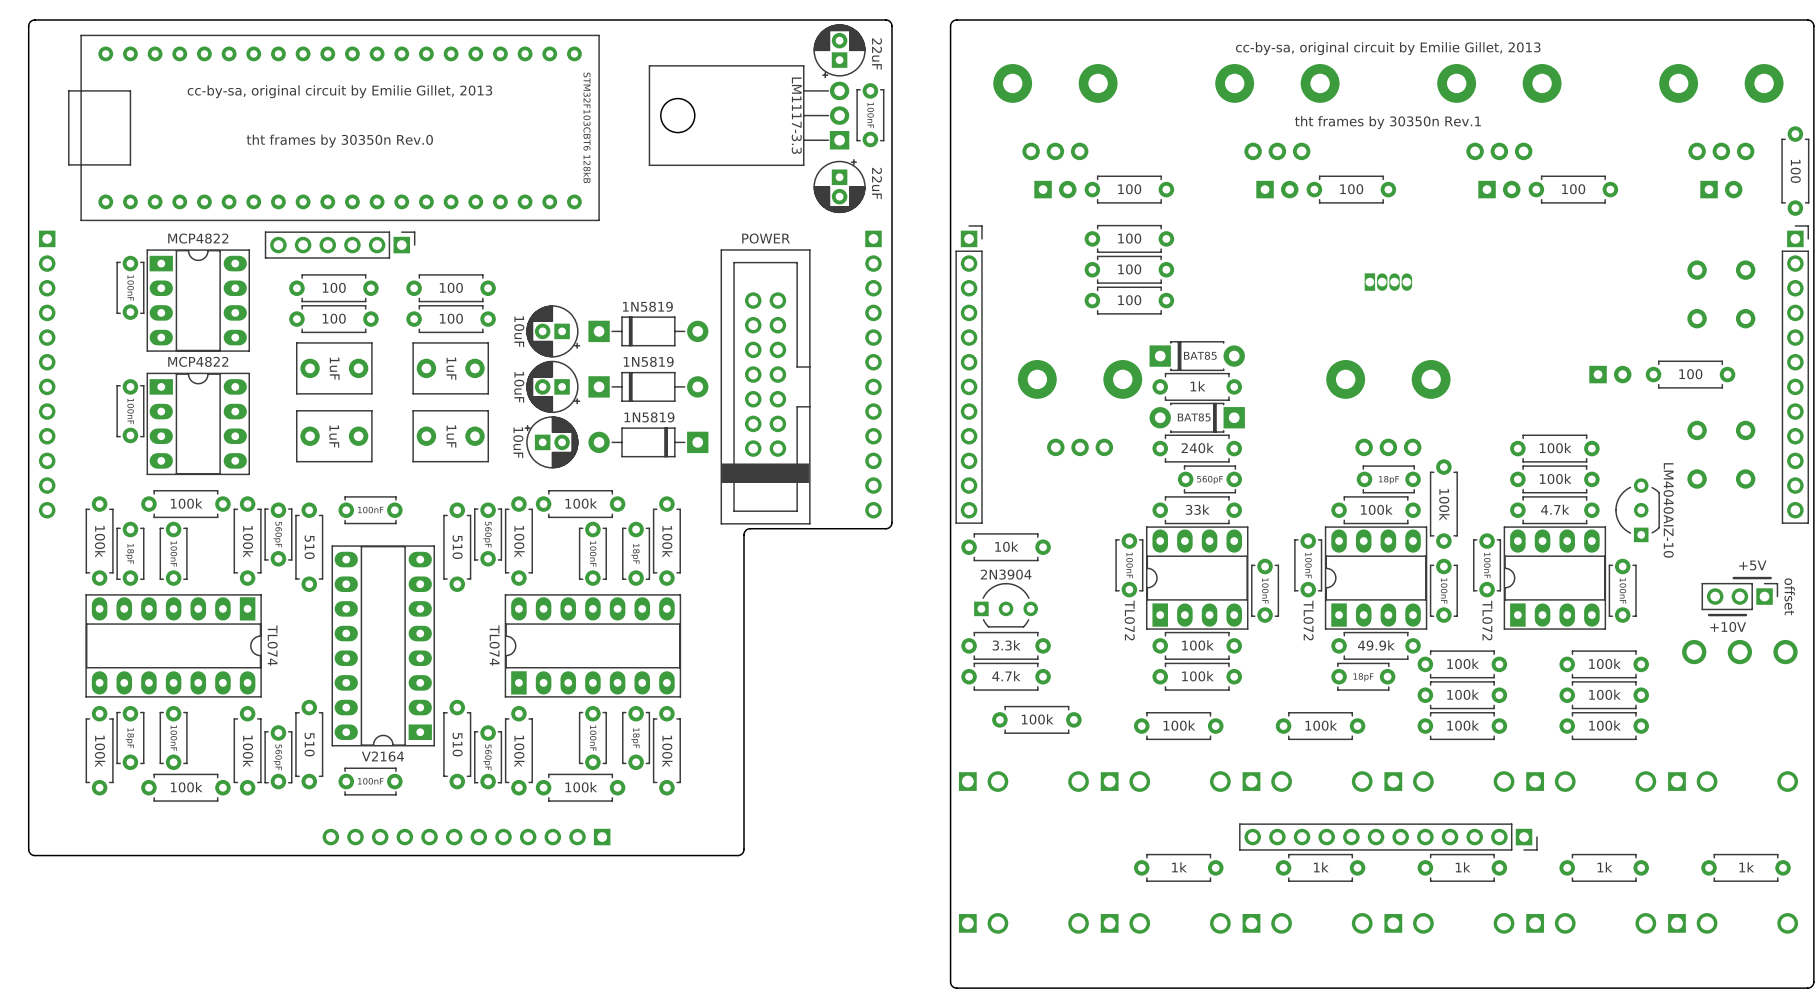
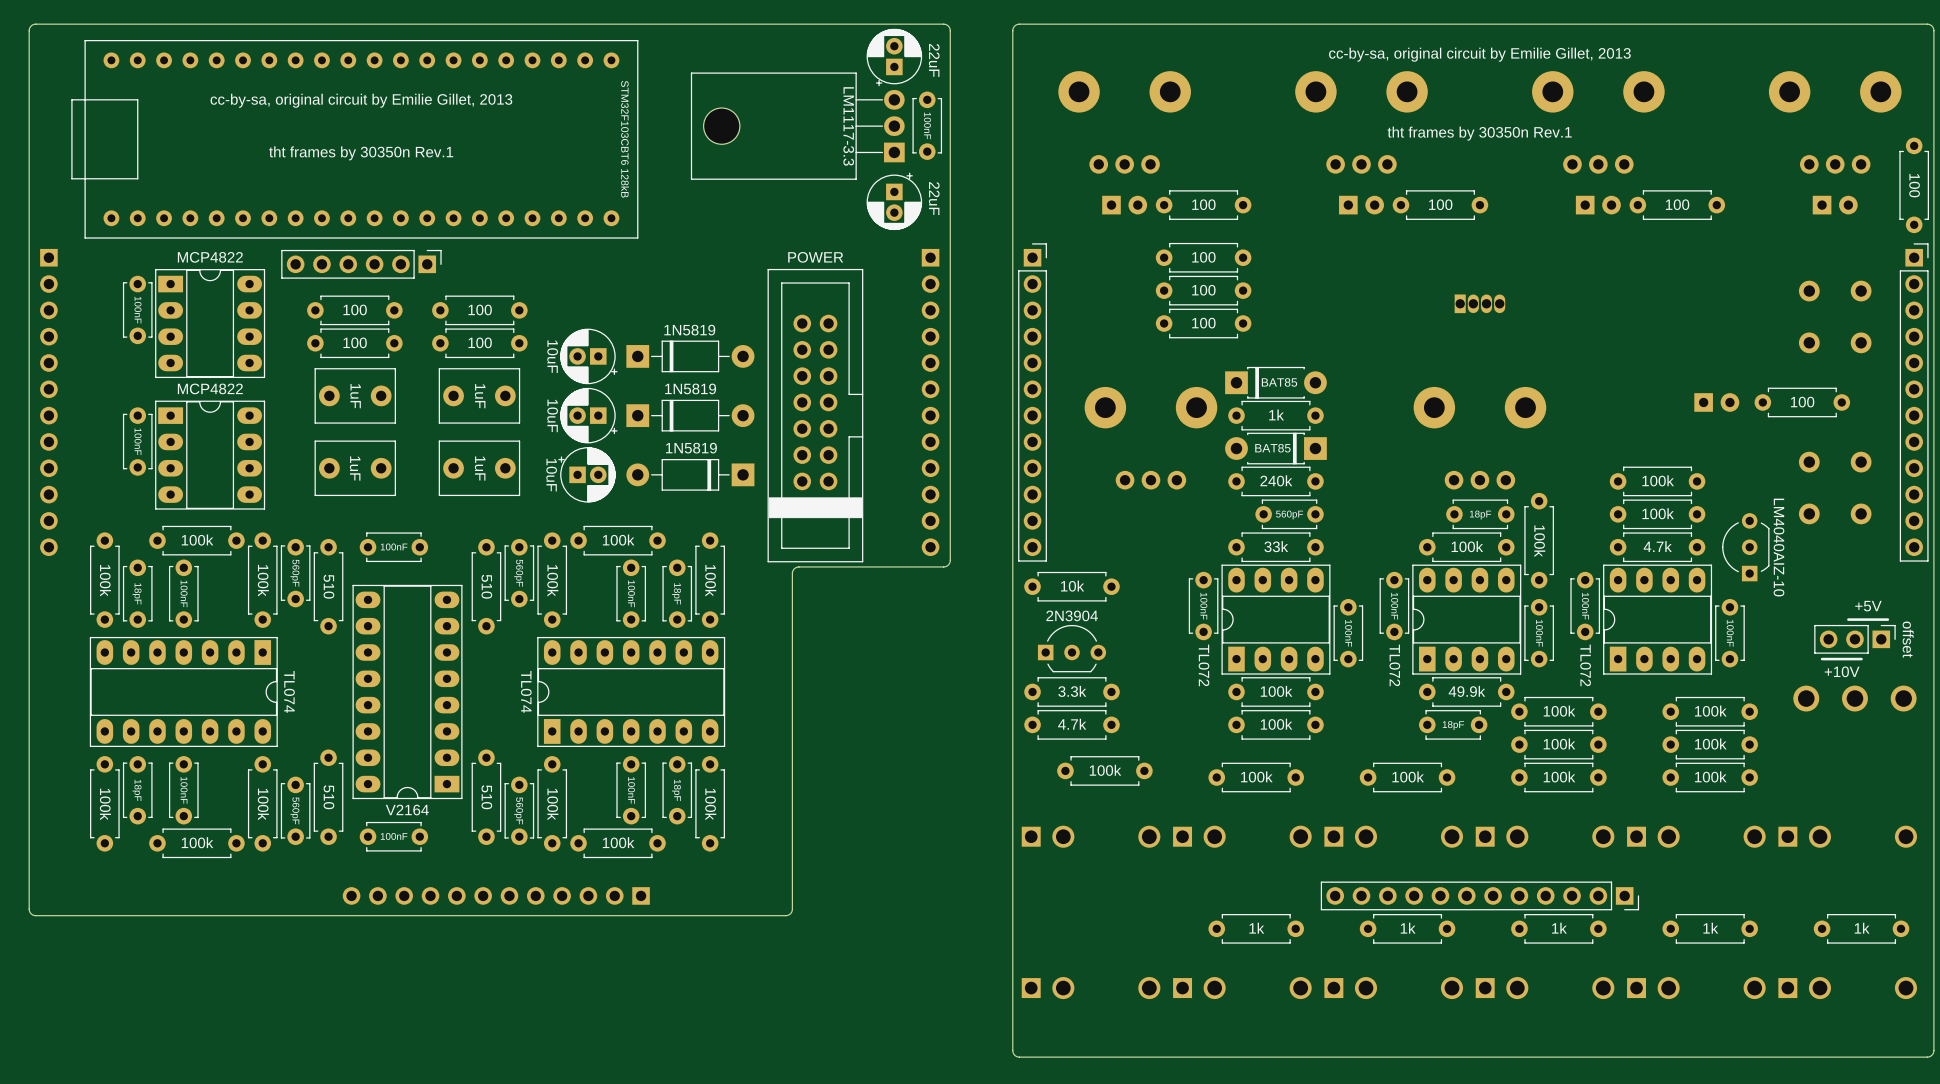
text: tht frames by 30350n Rev.0 (339, 141) -> tht frames by 30350n Rev.1 (361, 153)

